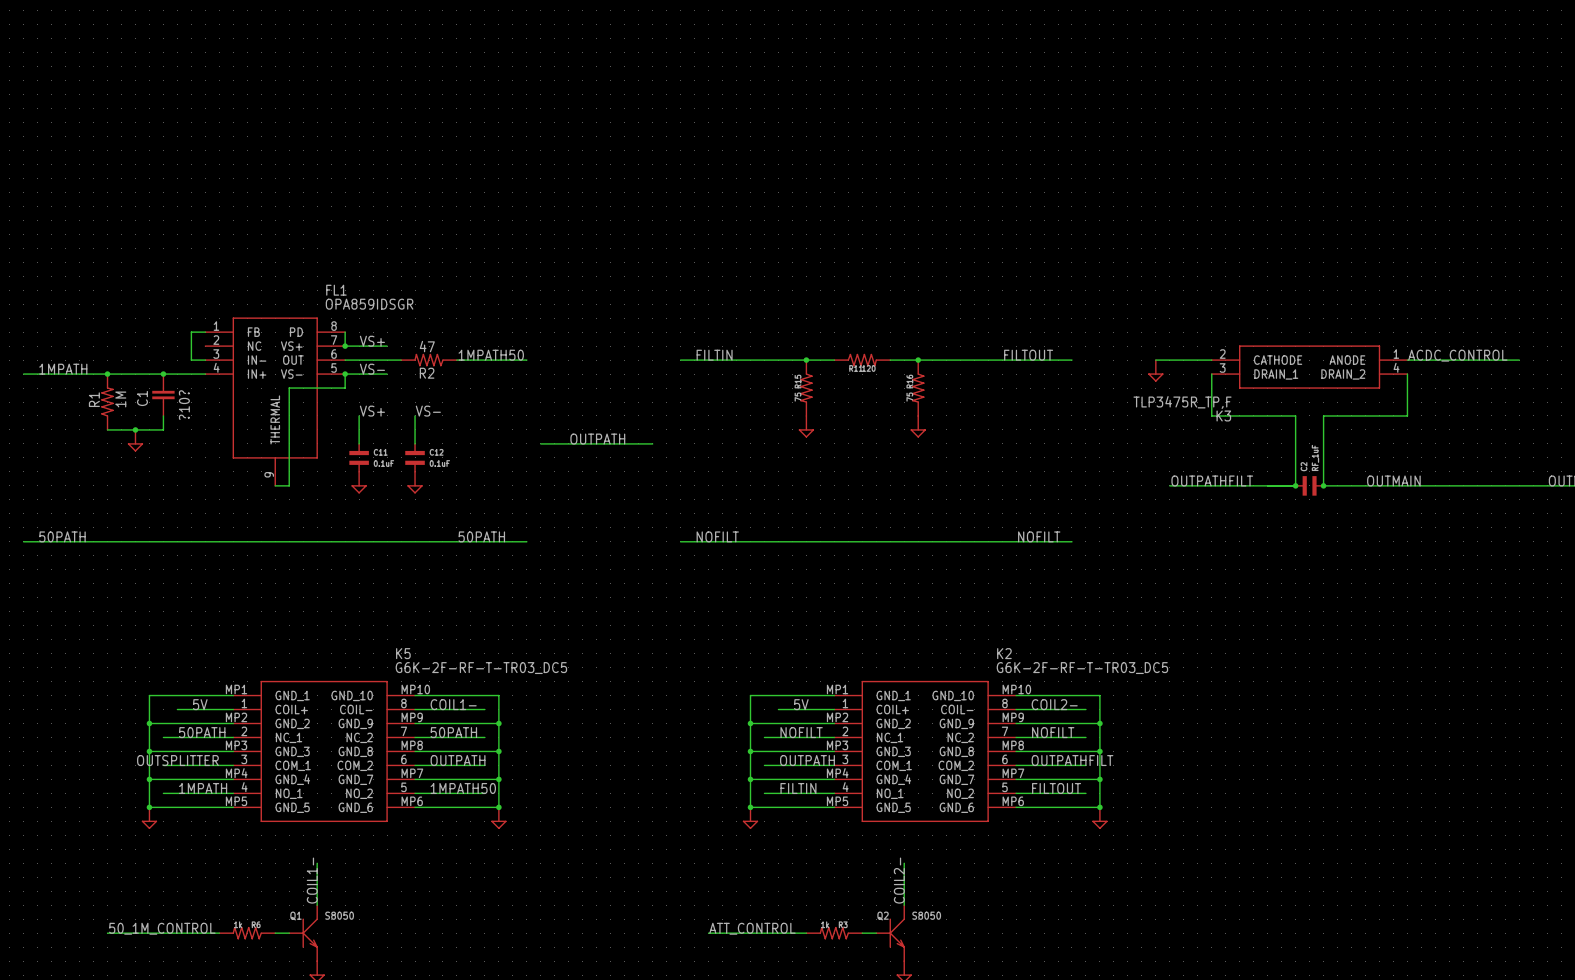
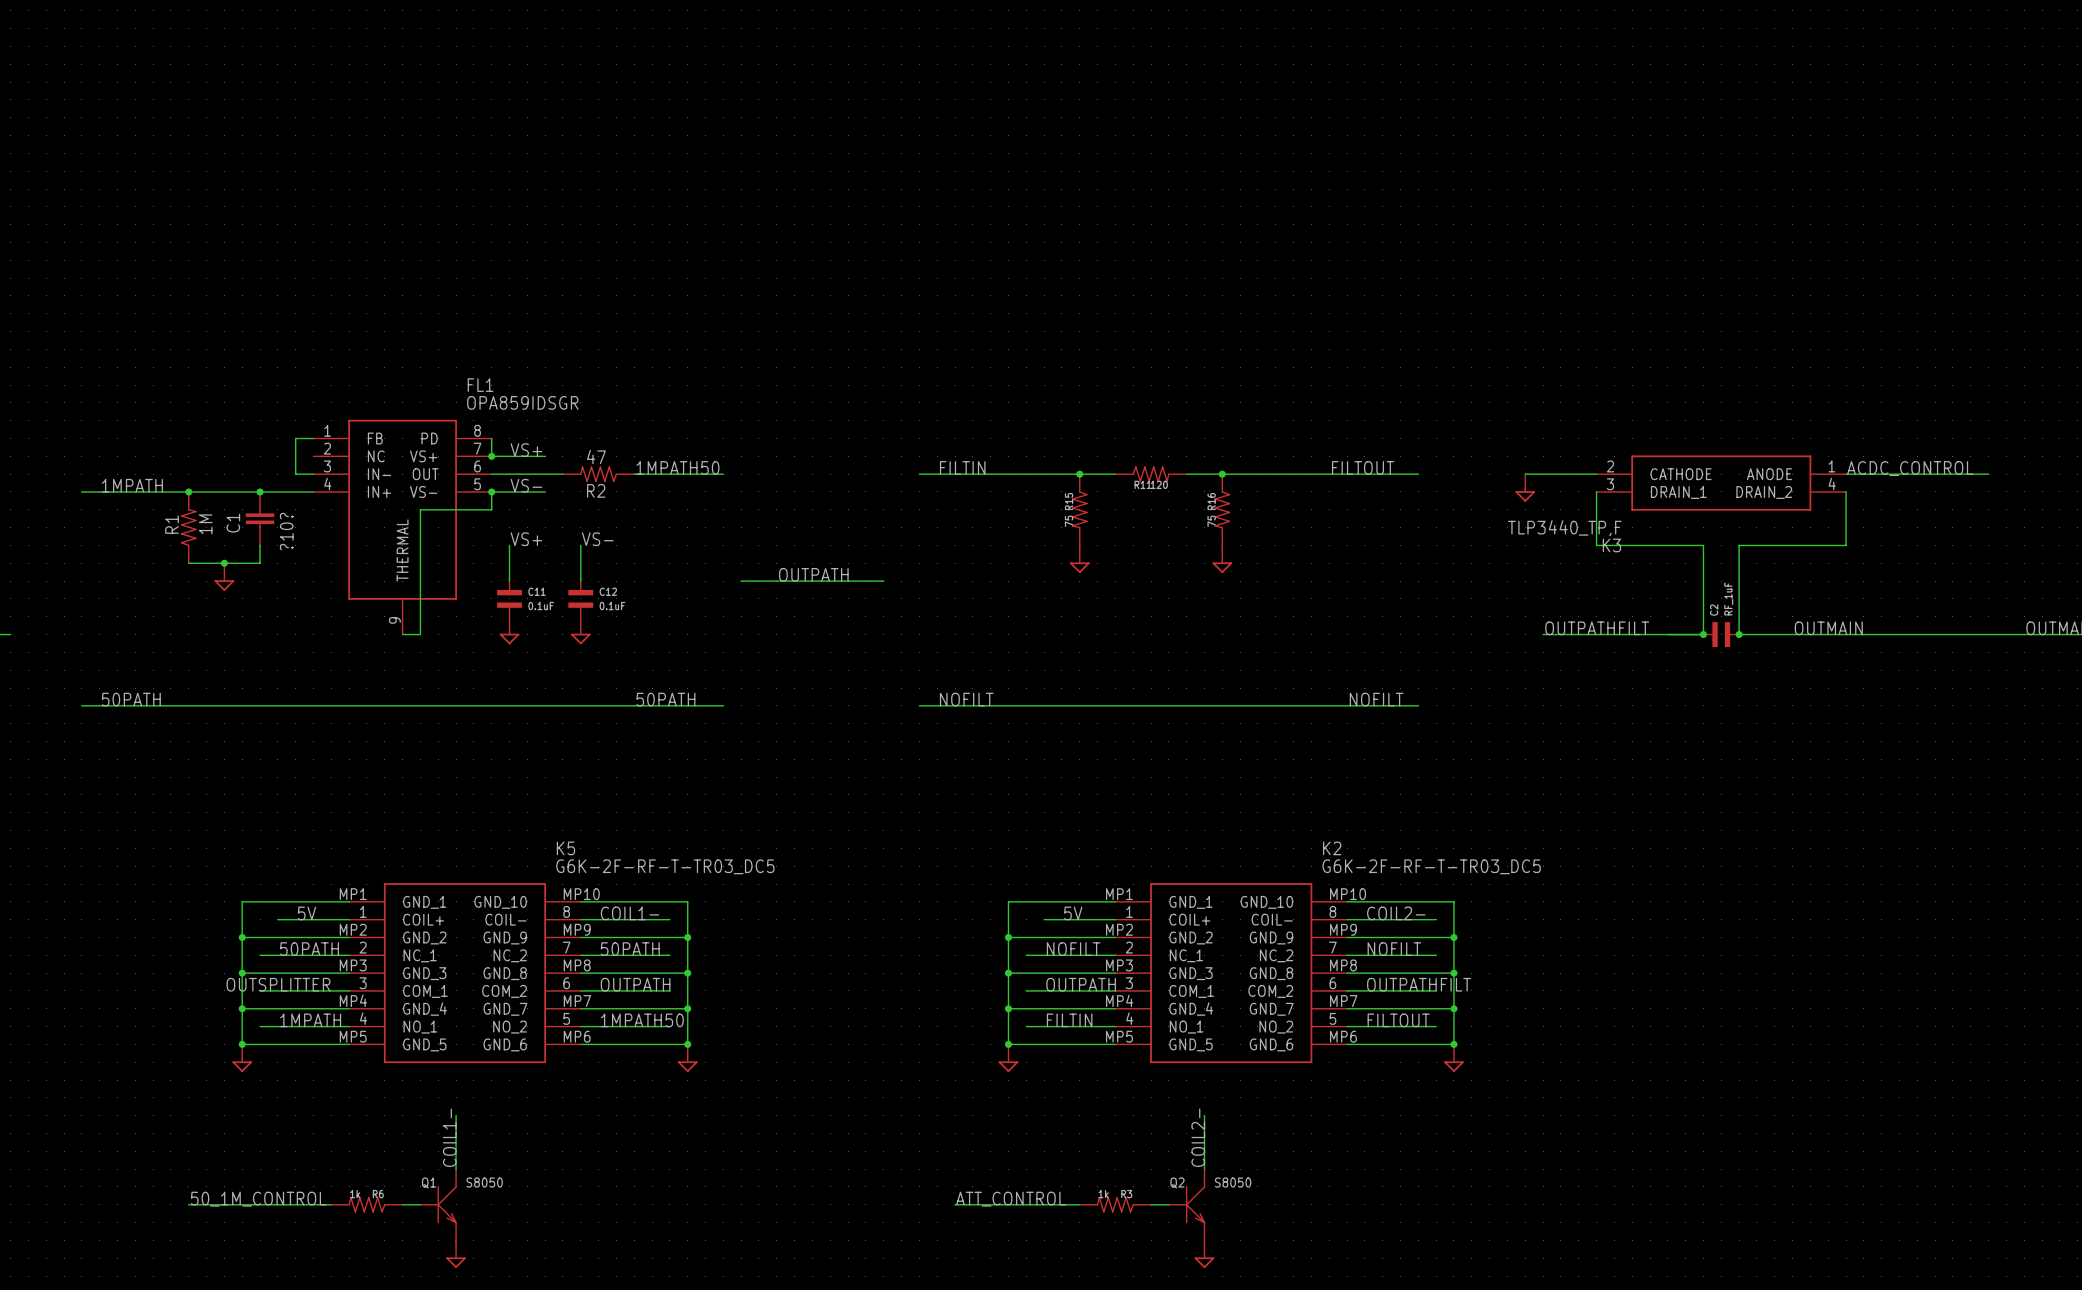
K3 value: TLP3475R_TP,F (1182, 402) -> TLP3440_TP,F (1564, 528)

